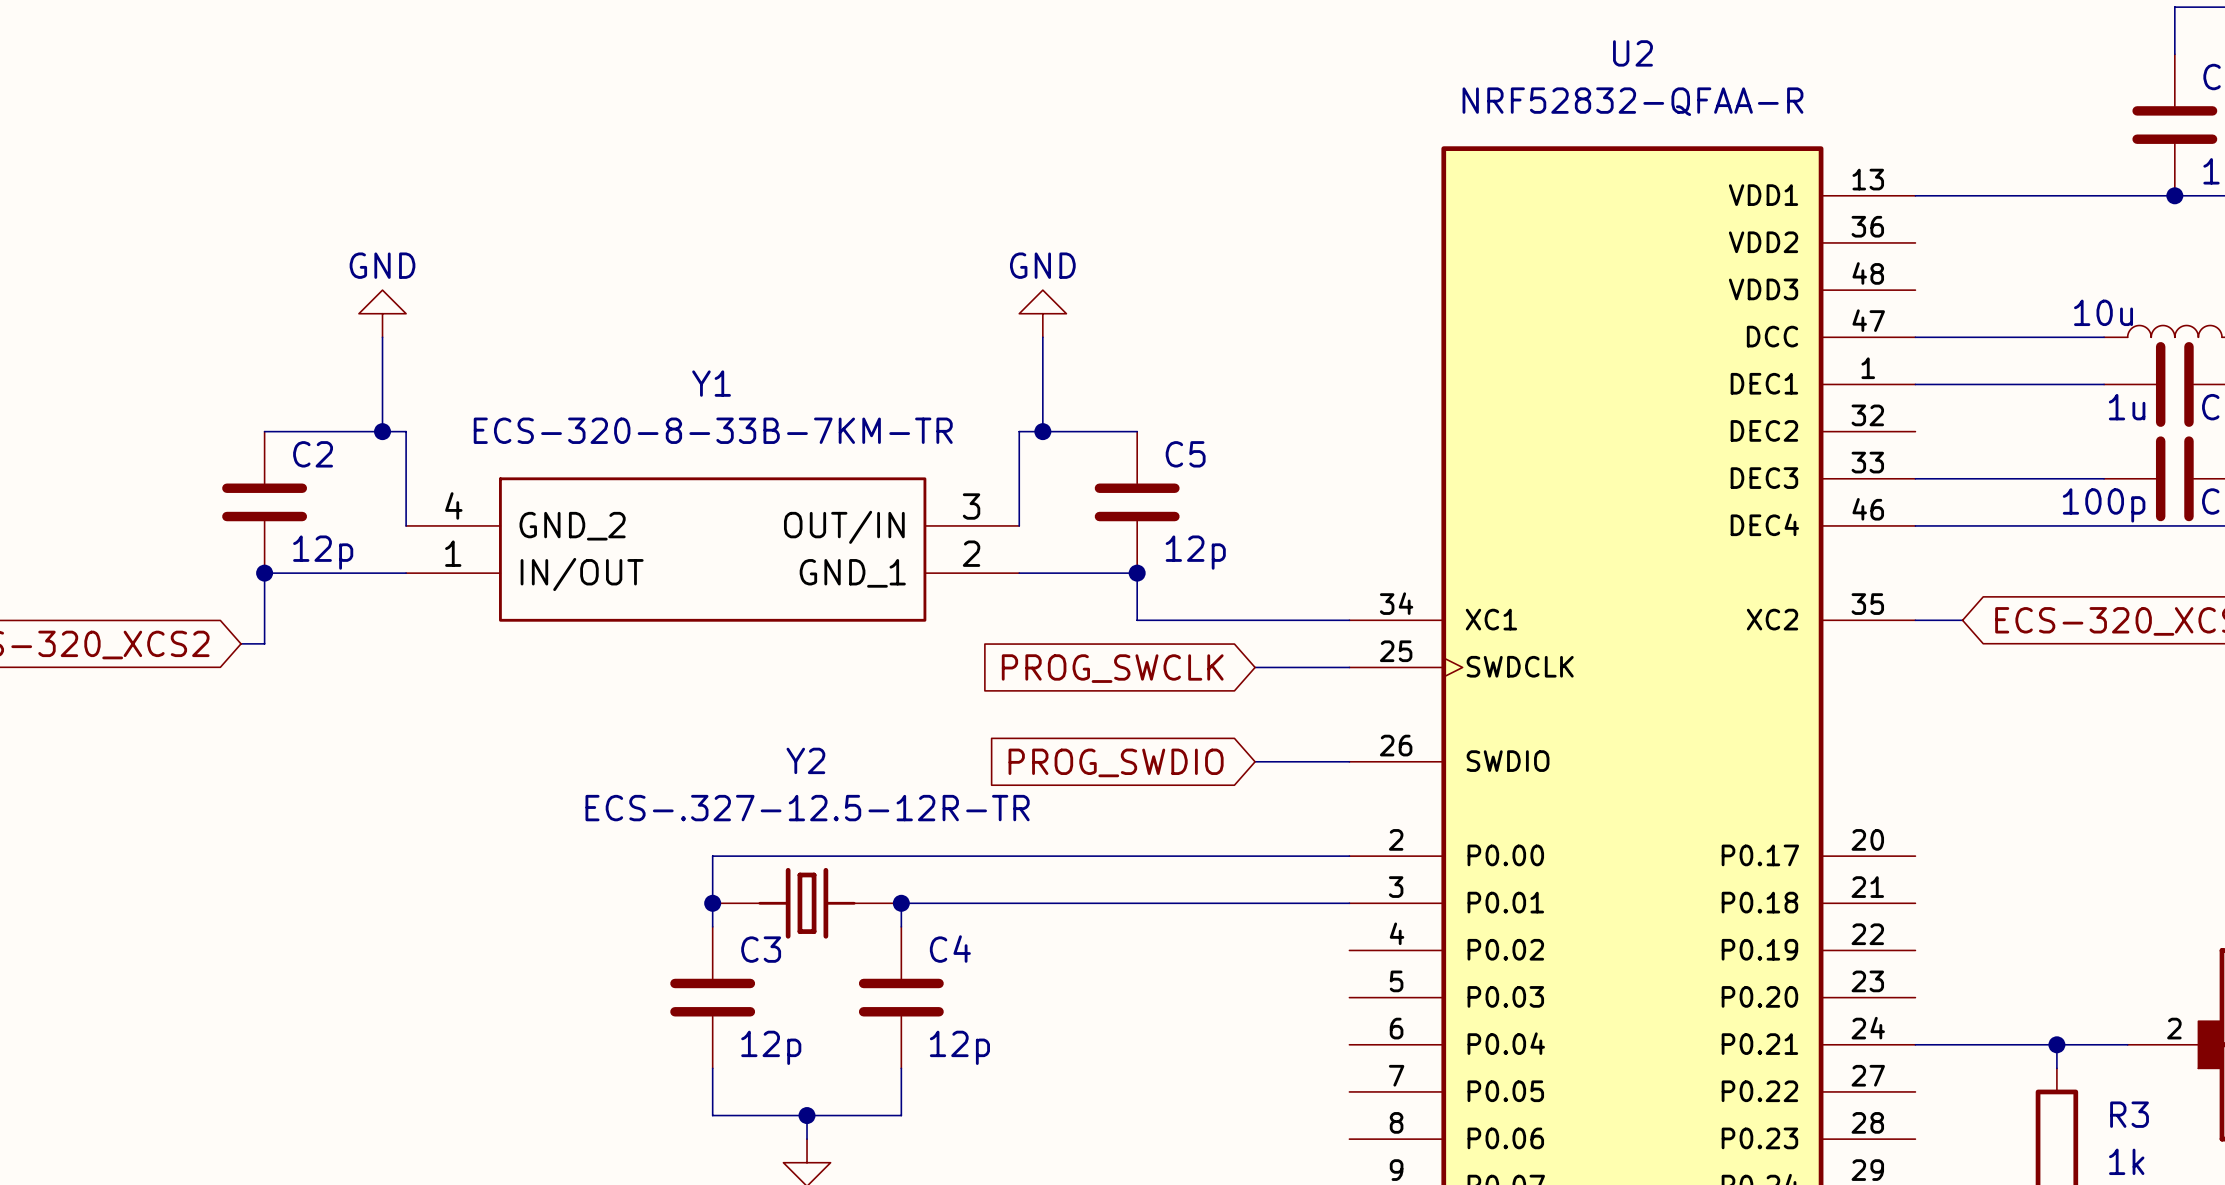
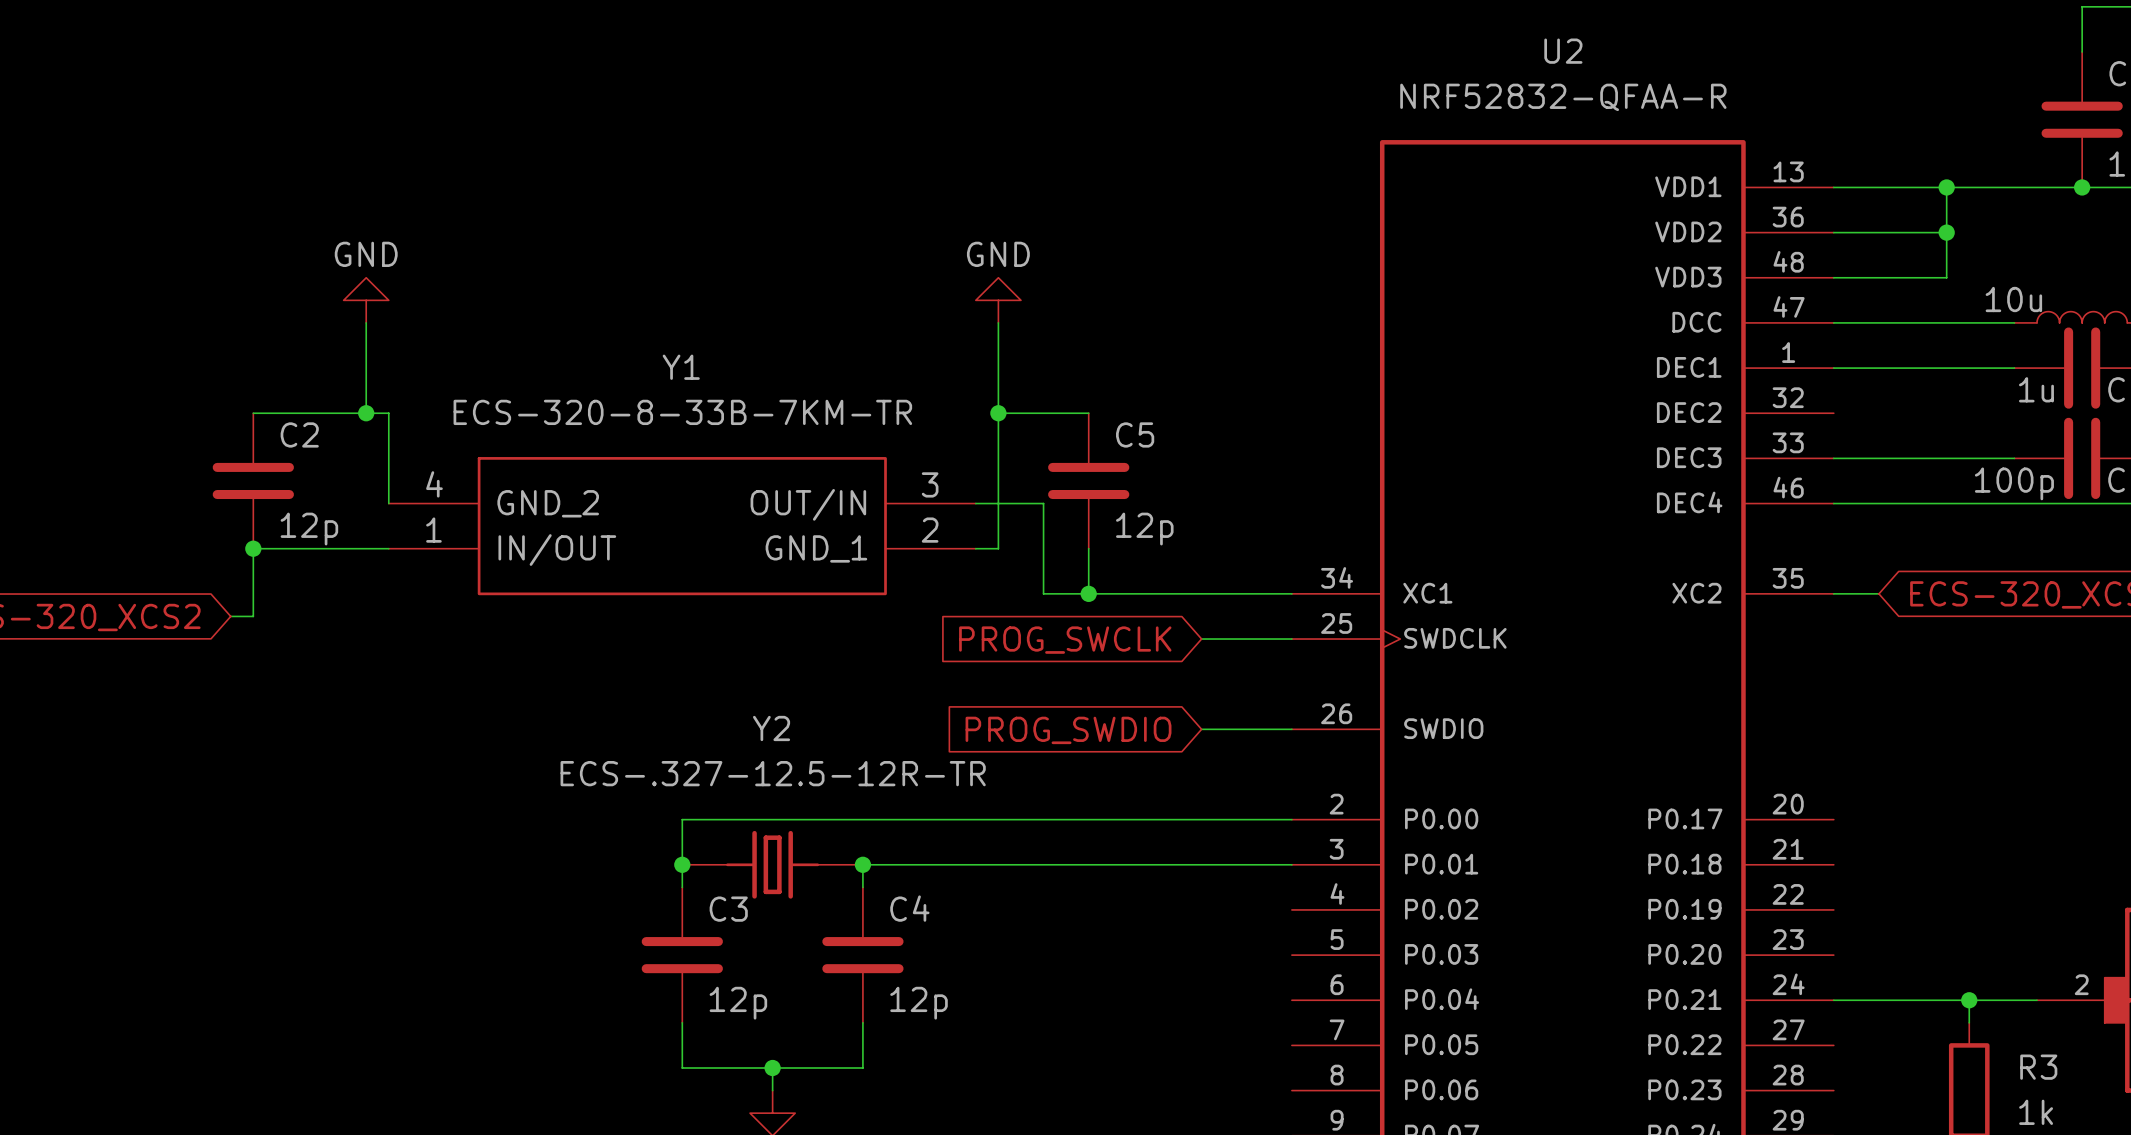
wire: none -> (1946, 187) (1946, 277) (1833, 277)
junction: none -> (1946, 187)
wire: none -> (1833, 232) (1946, 232)
junction: none -> (1946, 232)
wire: (1042, 431) (1019, 431) (1019, 525) -> (998, 413) (998, 548)
wire: none -> (975, 503) (1043, 503) (1043, 593) (1088, 593)
wire: (1042, 573) (1137, 573) -> none
junction position: (1137, 573) -> (1088, 593)

